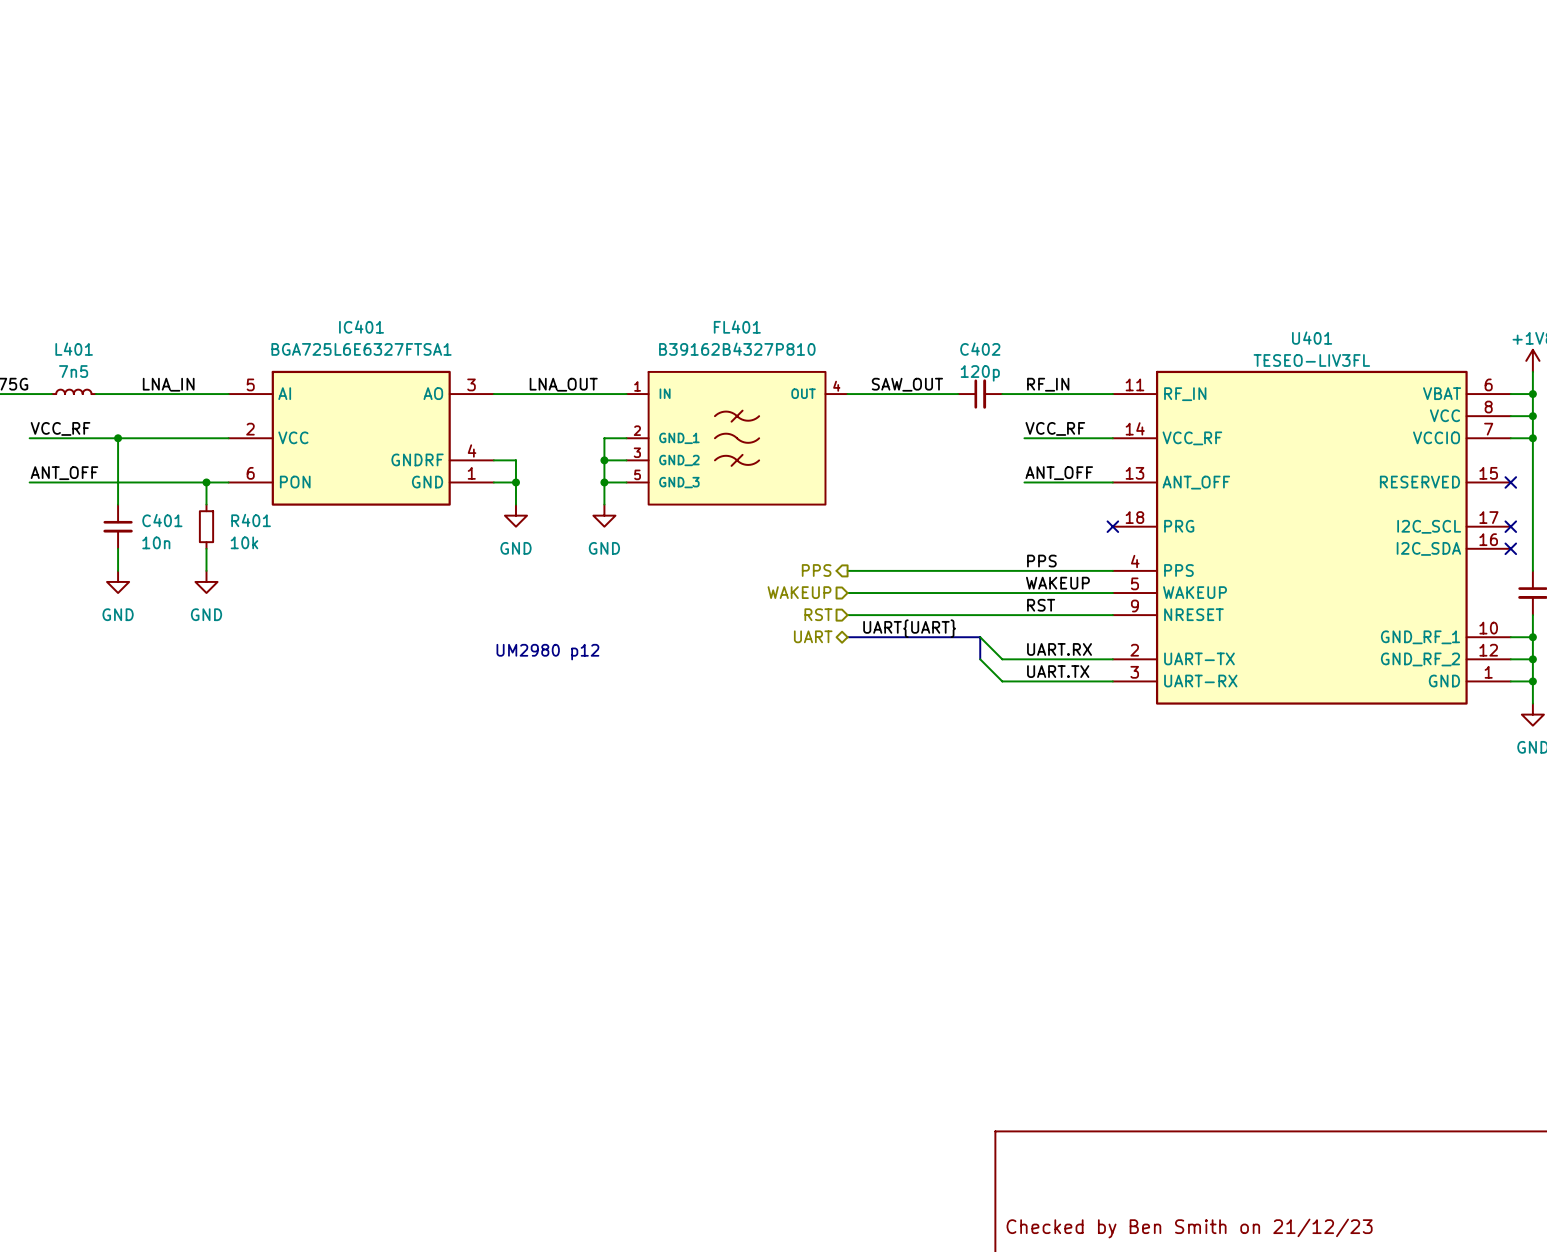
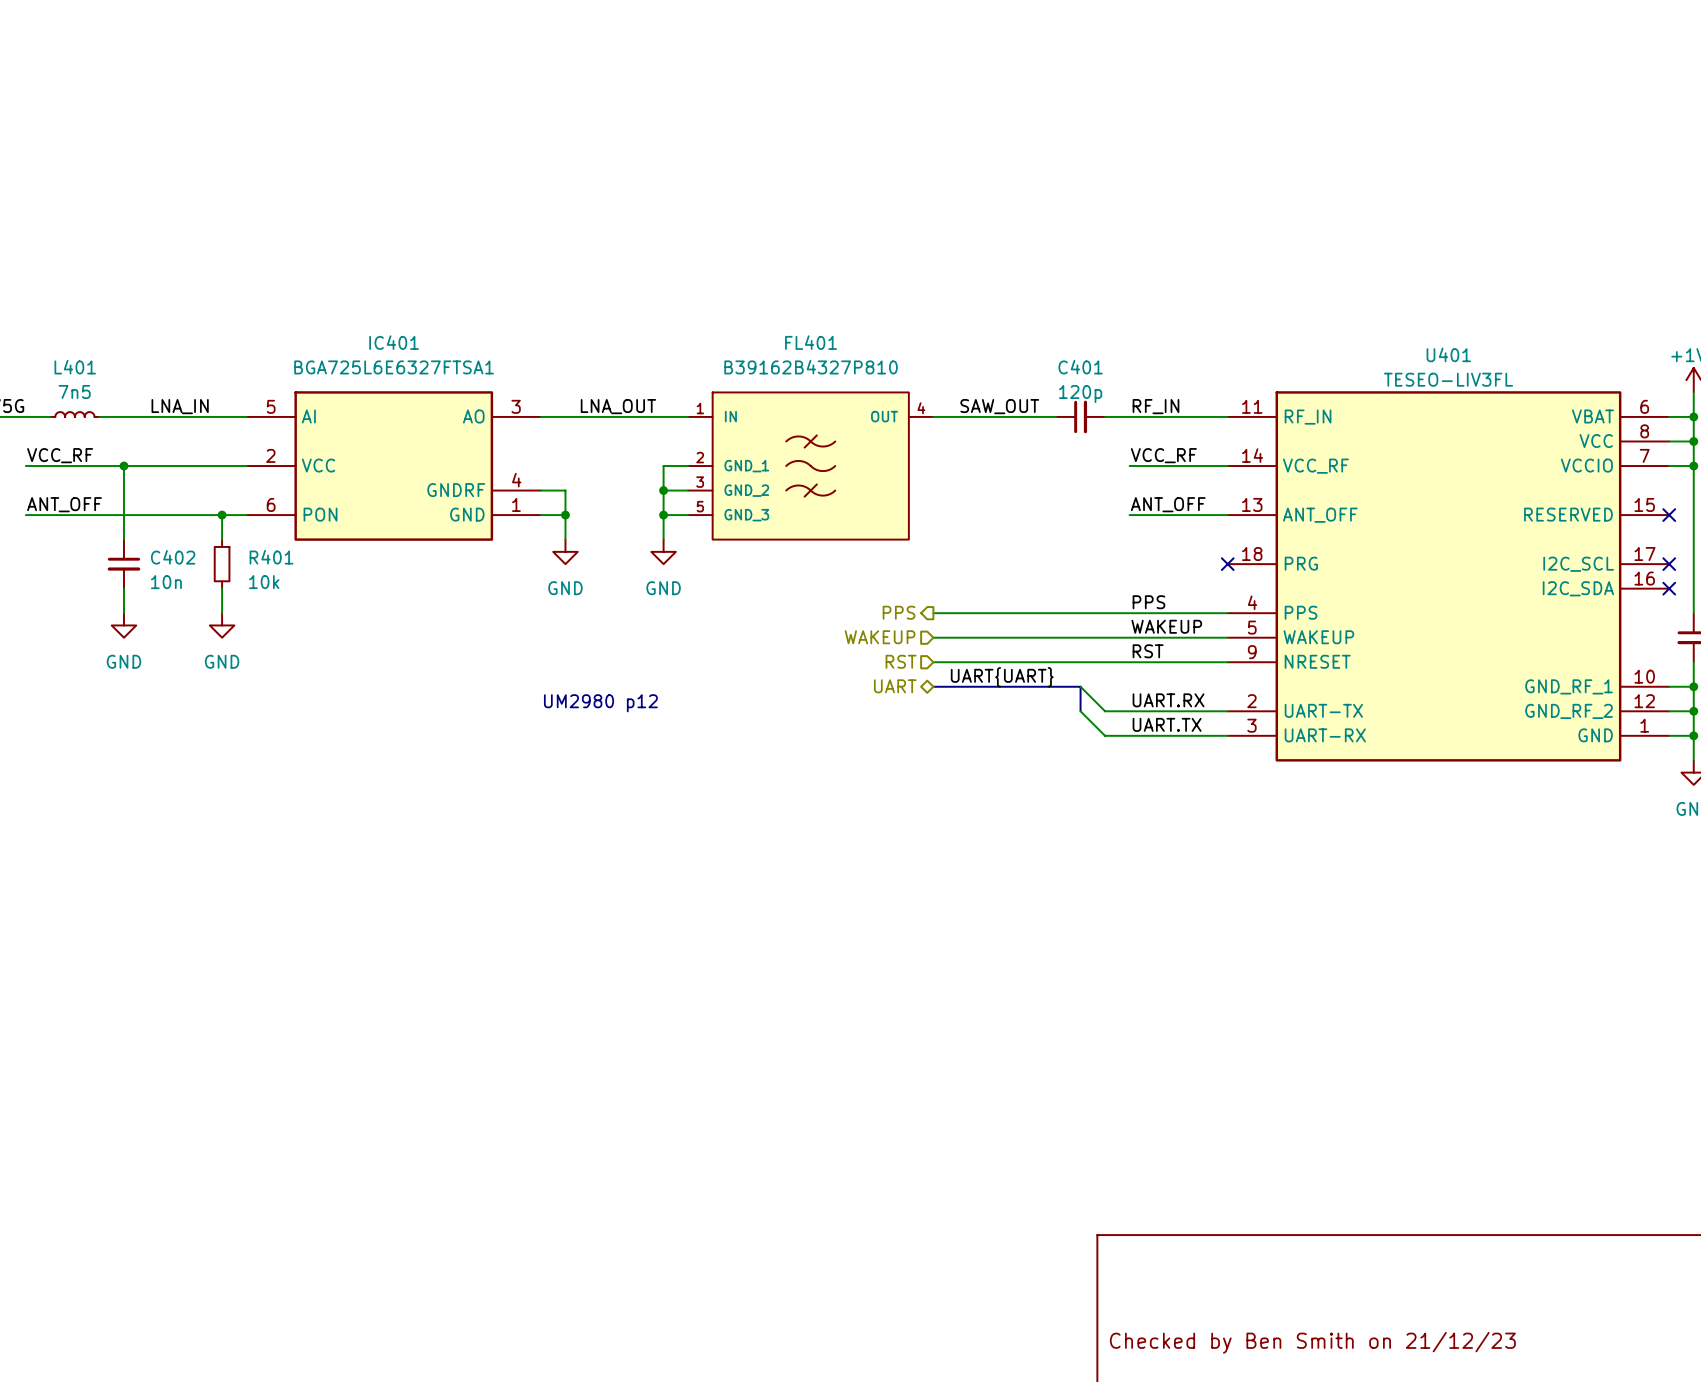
C402 name: C402 (980, 349) -> C401 (1080, 367)
C401 name: C401 (162, 520) -> C402 (173, 557)

